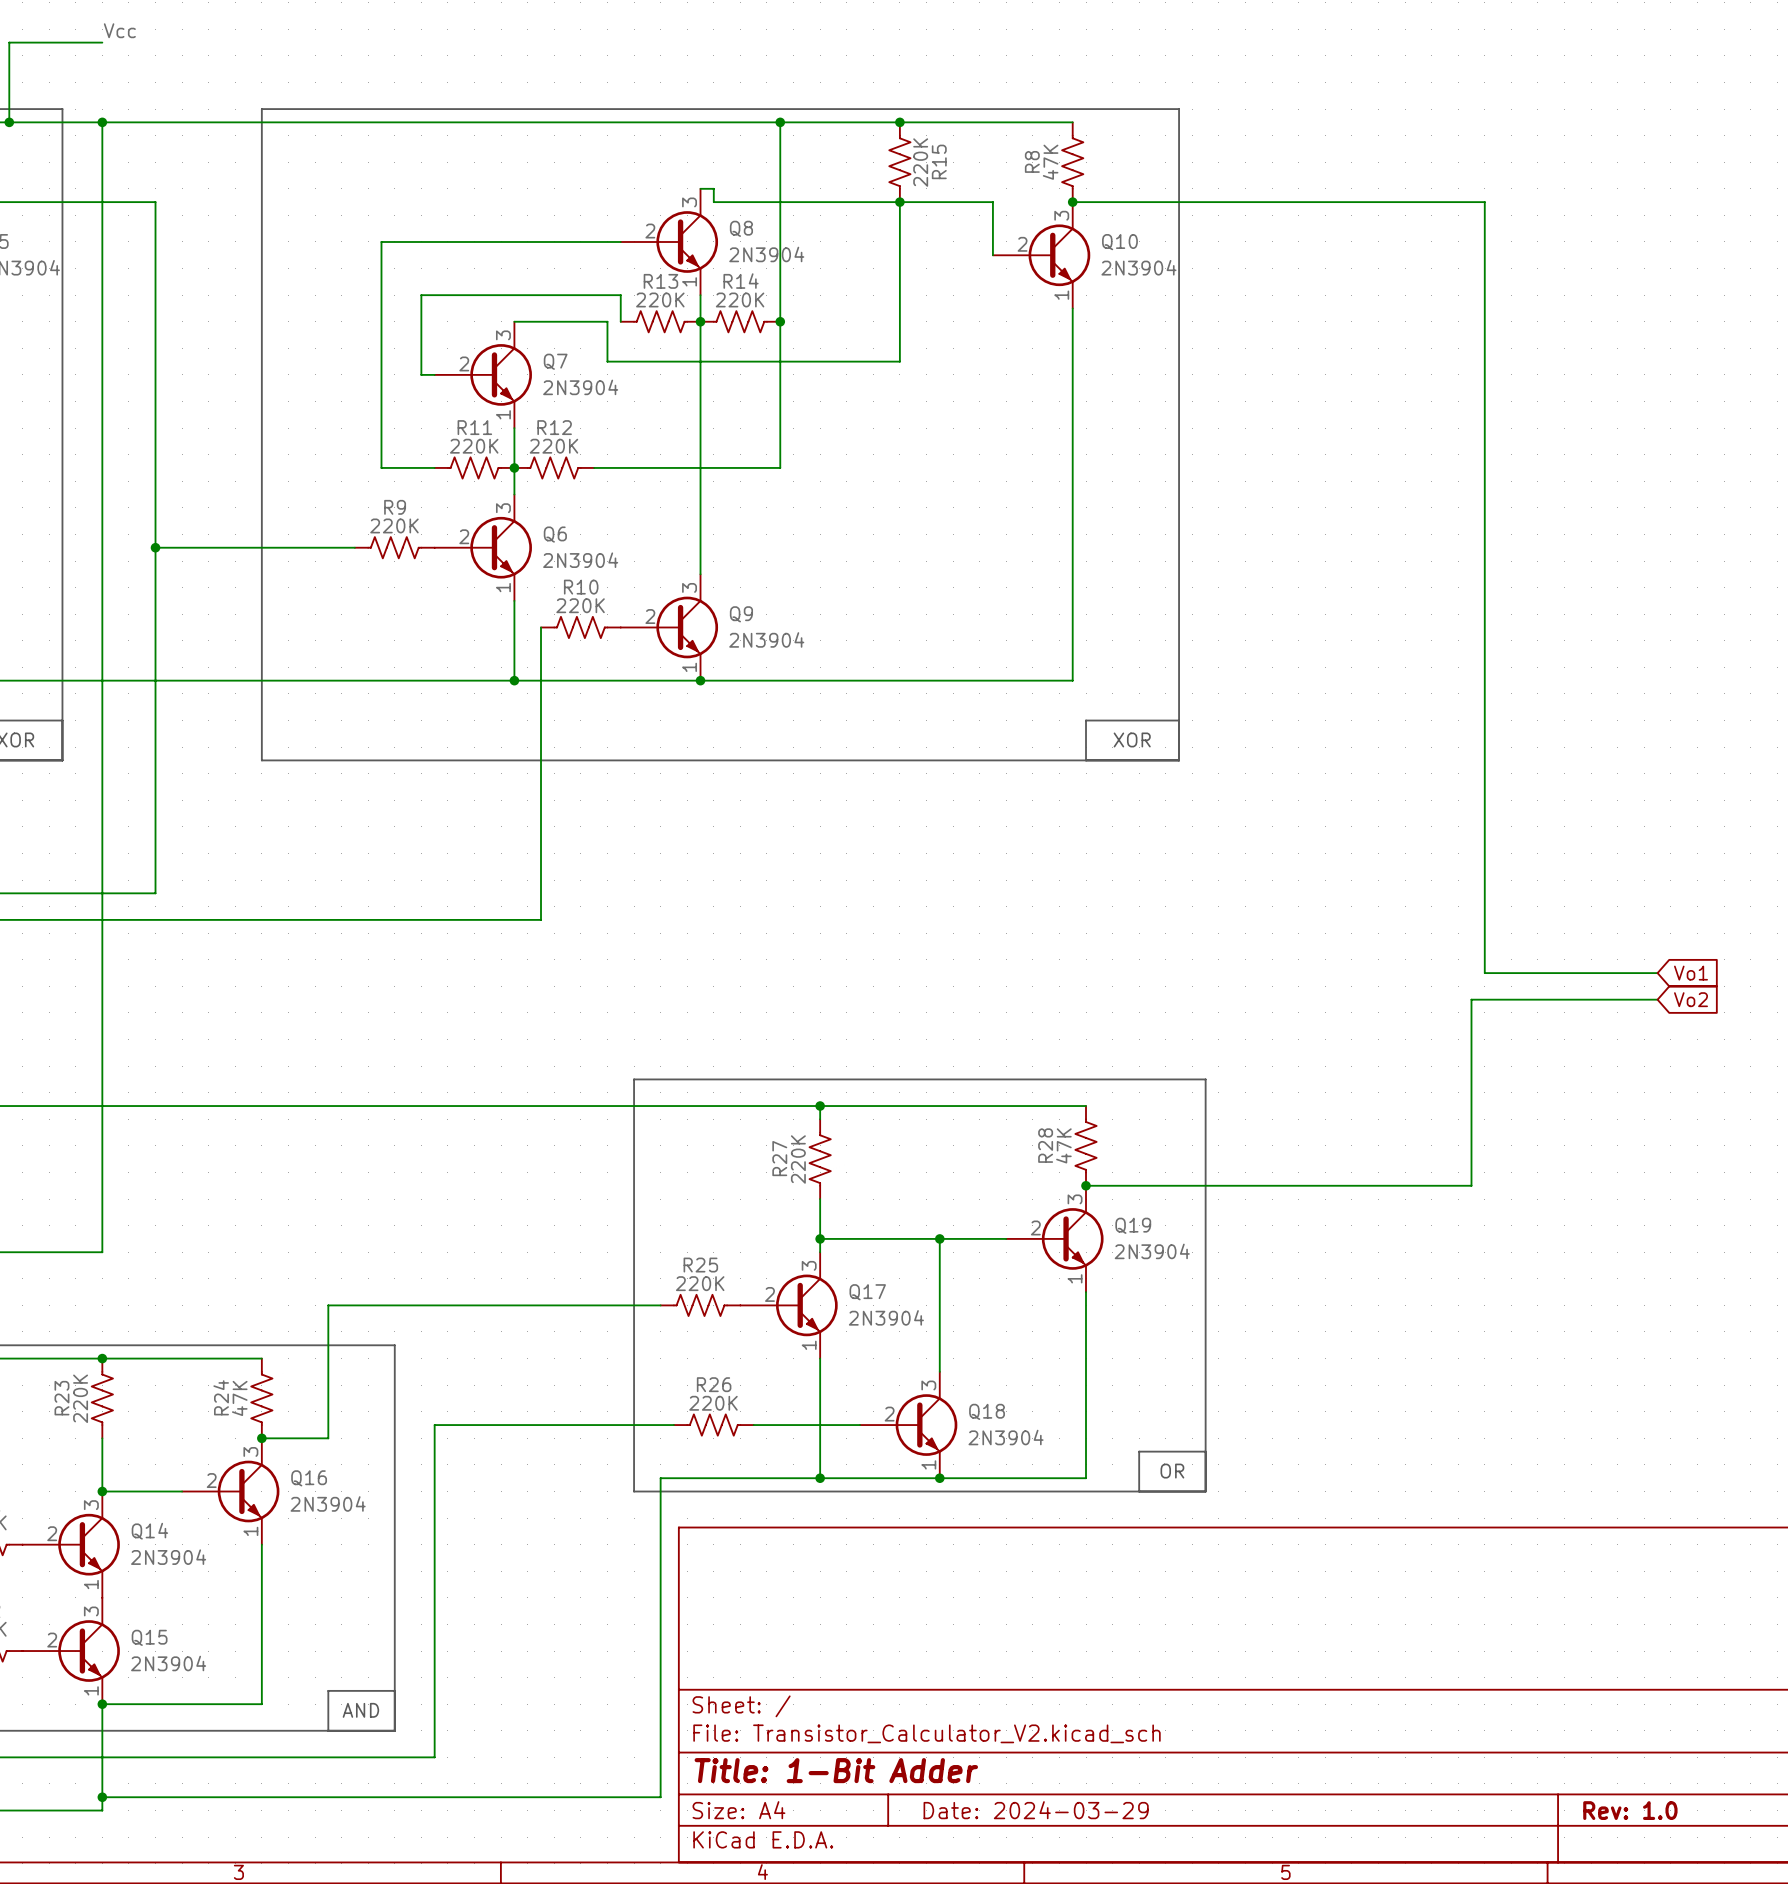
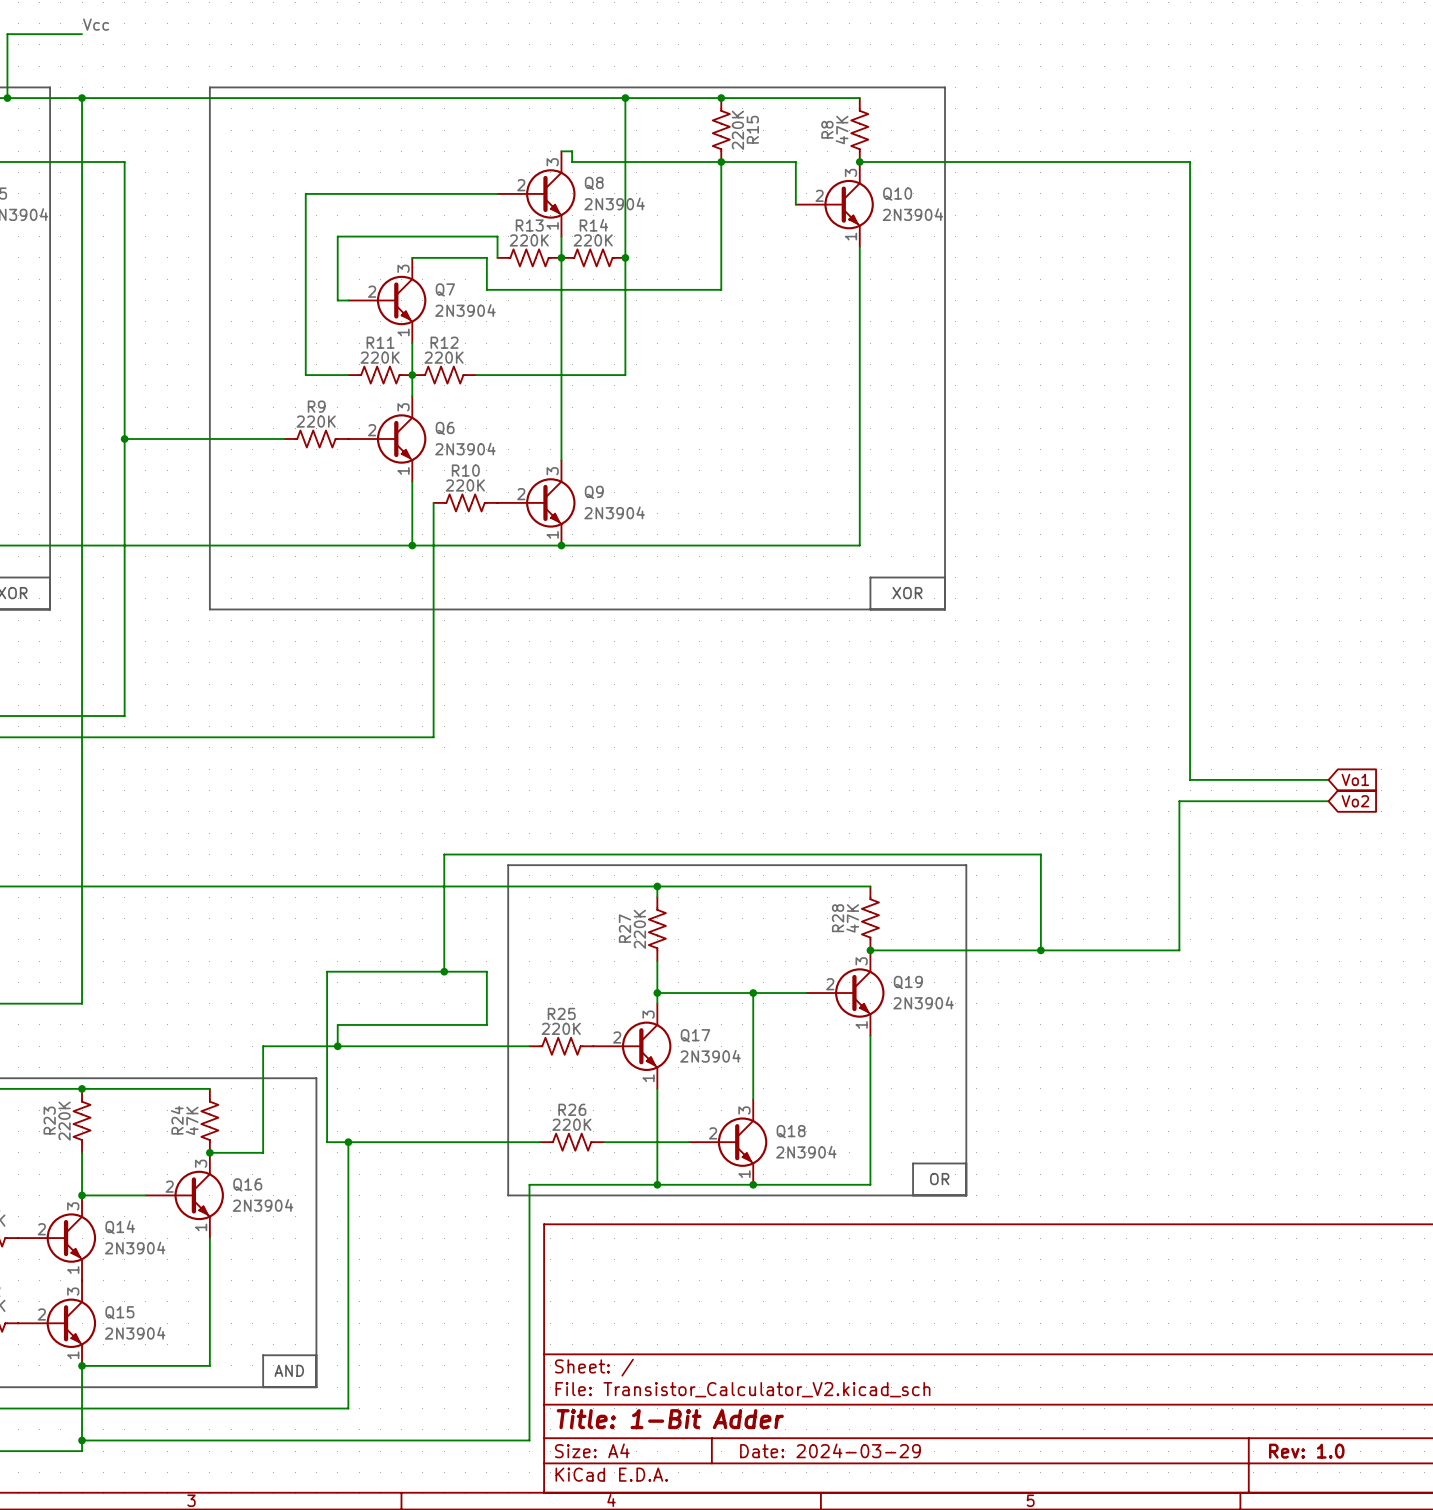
wire: none -> (1040, 950) (1040, 854) (444, 854) (444, 971)
junction: none -> (1040, 950)
junction: none -> (444, 971)
wire: none -> (337, 1046) (337, 1024) (486, 1024) (486, 971) (327, 971) (327, 1142) (348, 1142)
junction: none -> (337, 1046)
junction: none -> (348, 1142)

